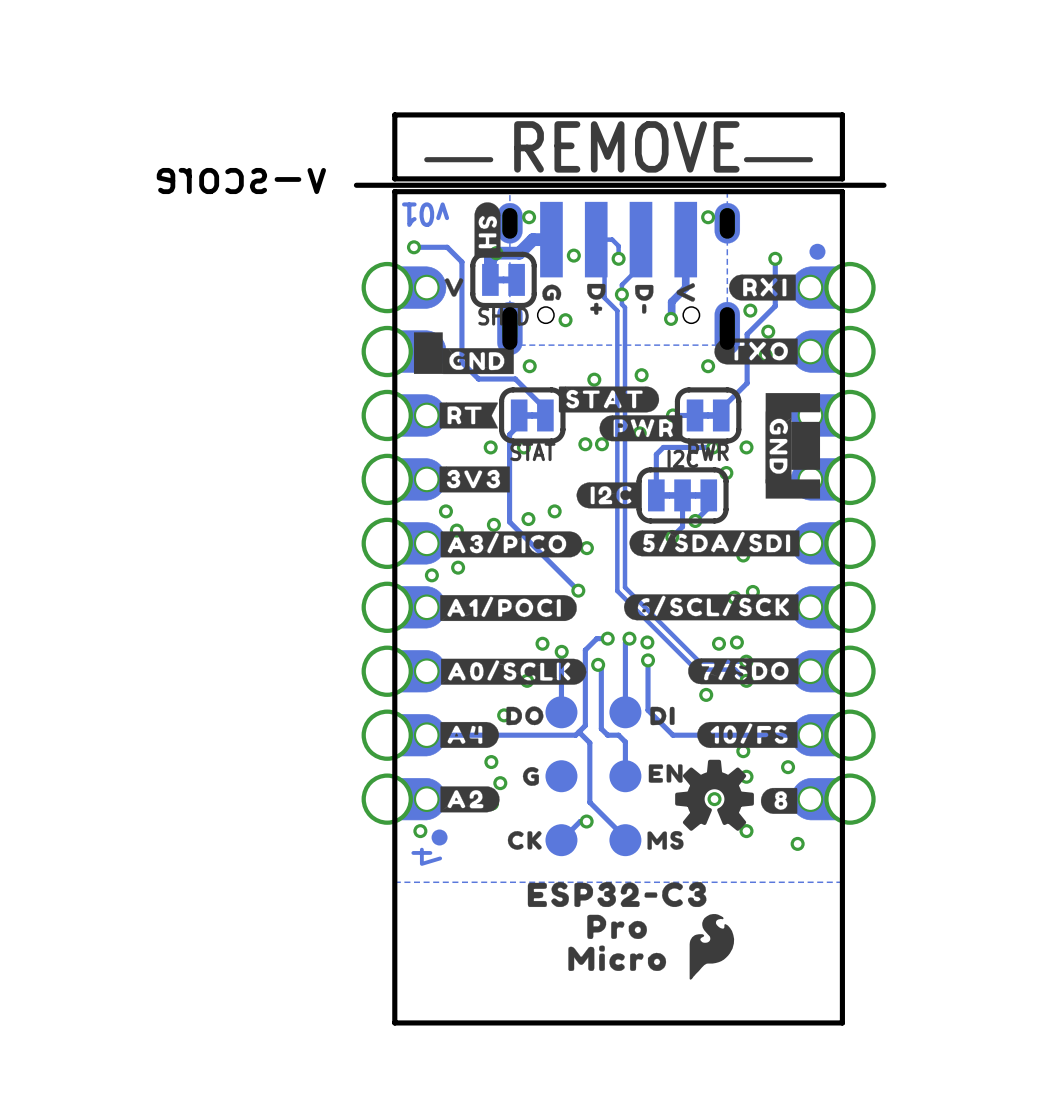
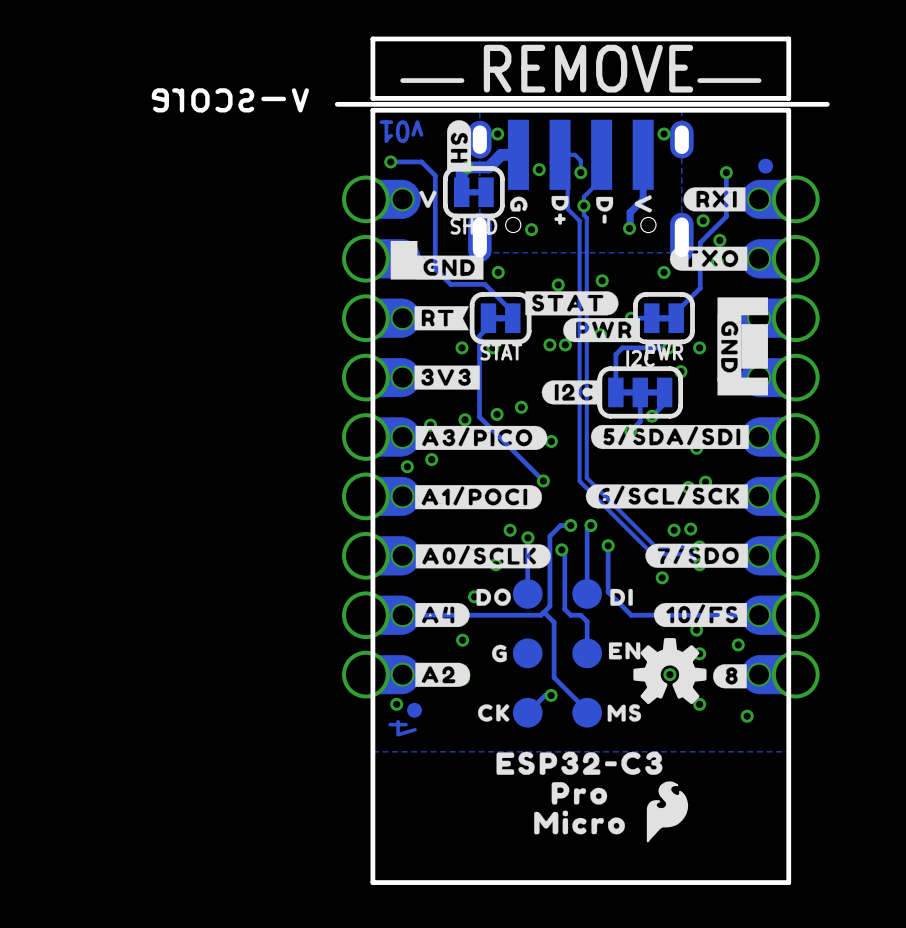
via: (445, 511) -> none
via: (647, 642) -> none
via: (500, 783) -> none

